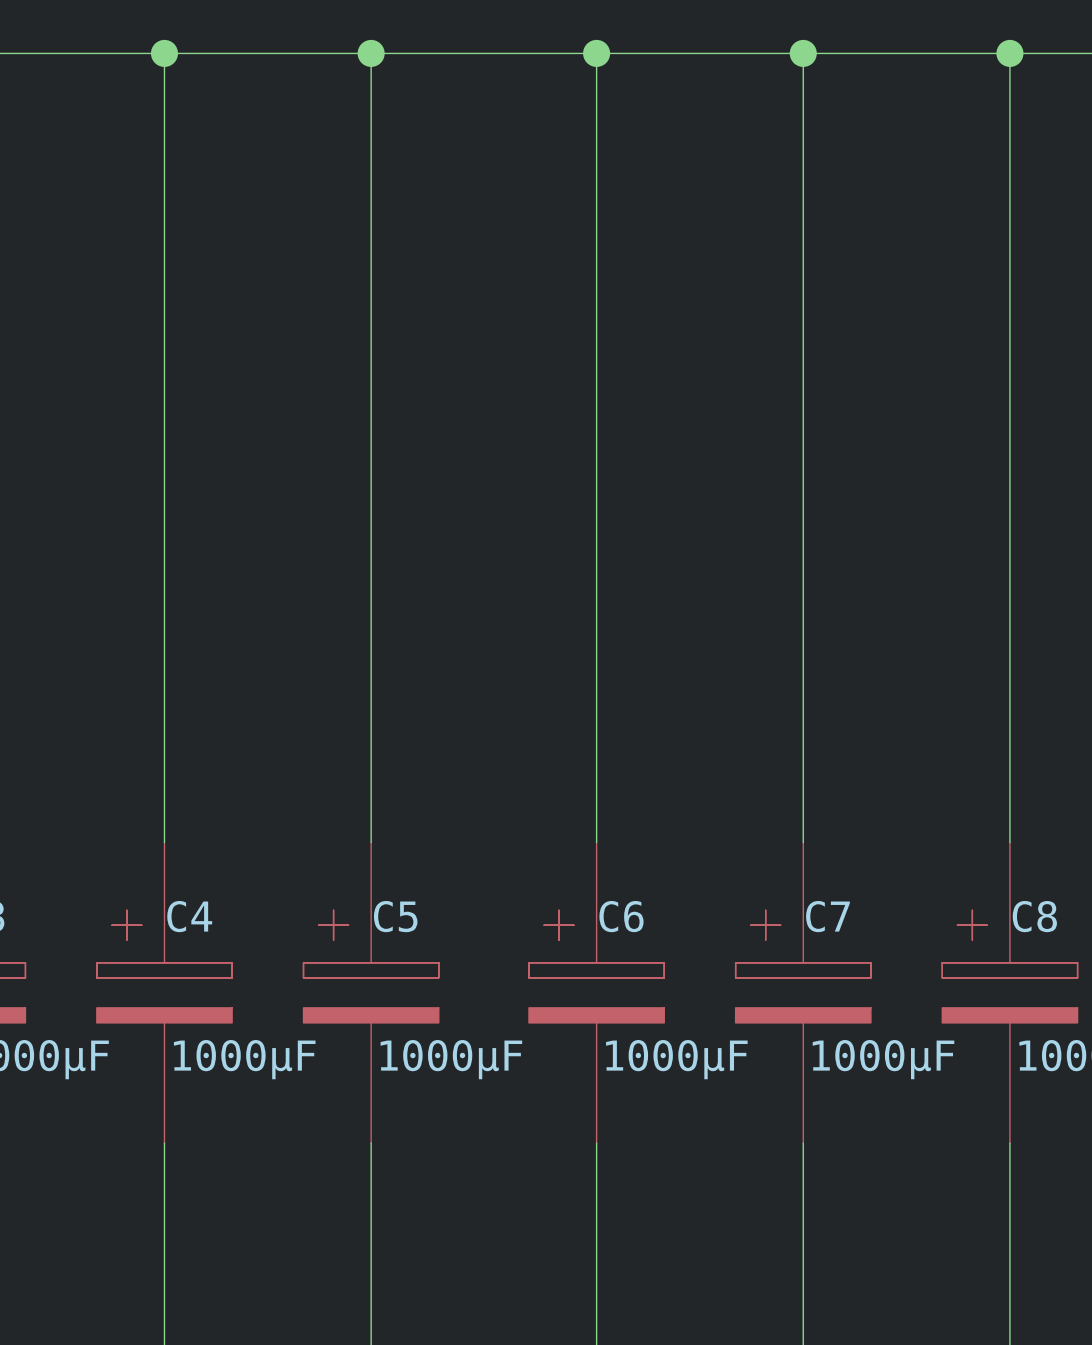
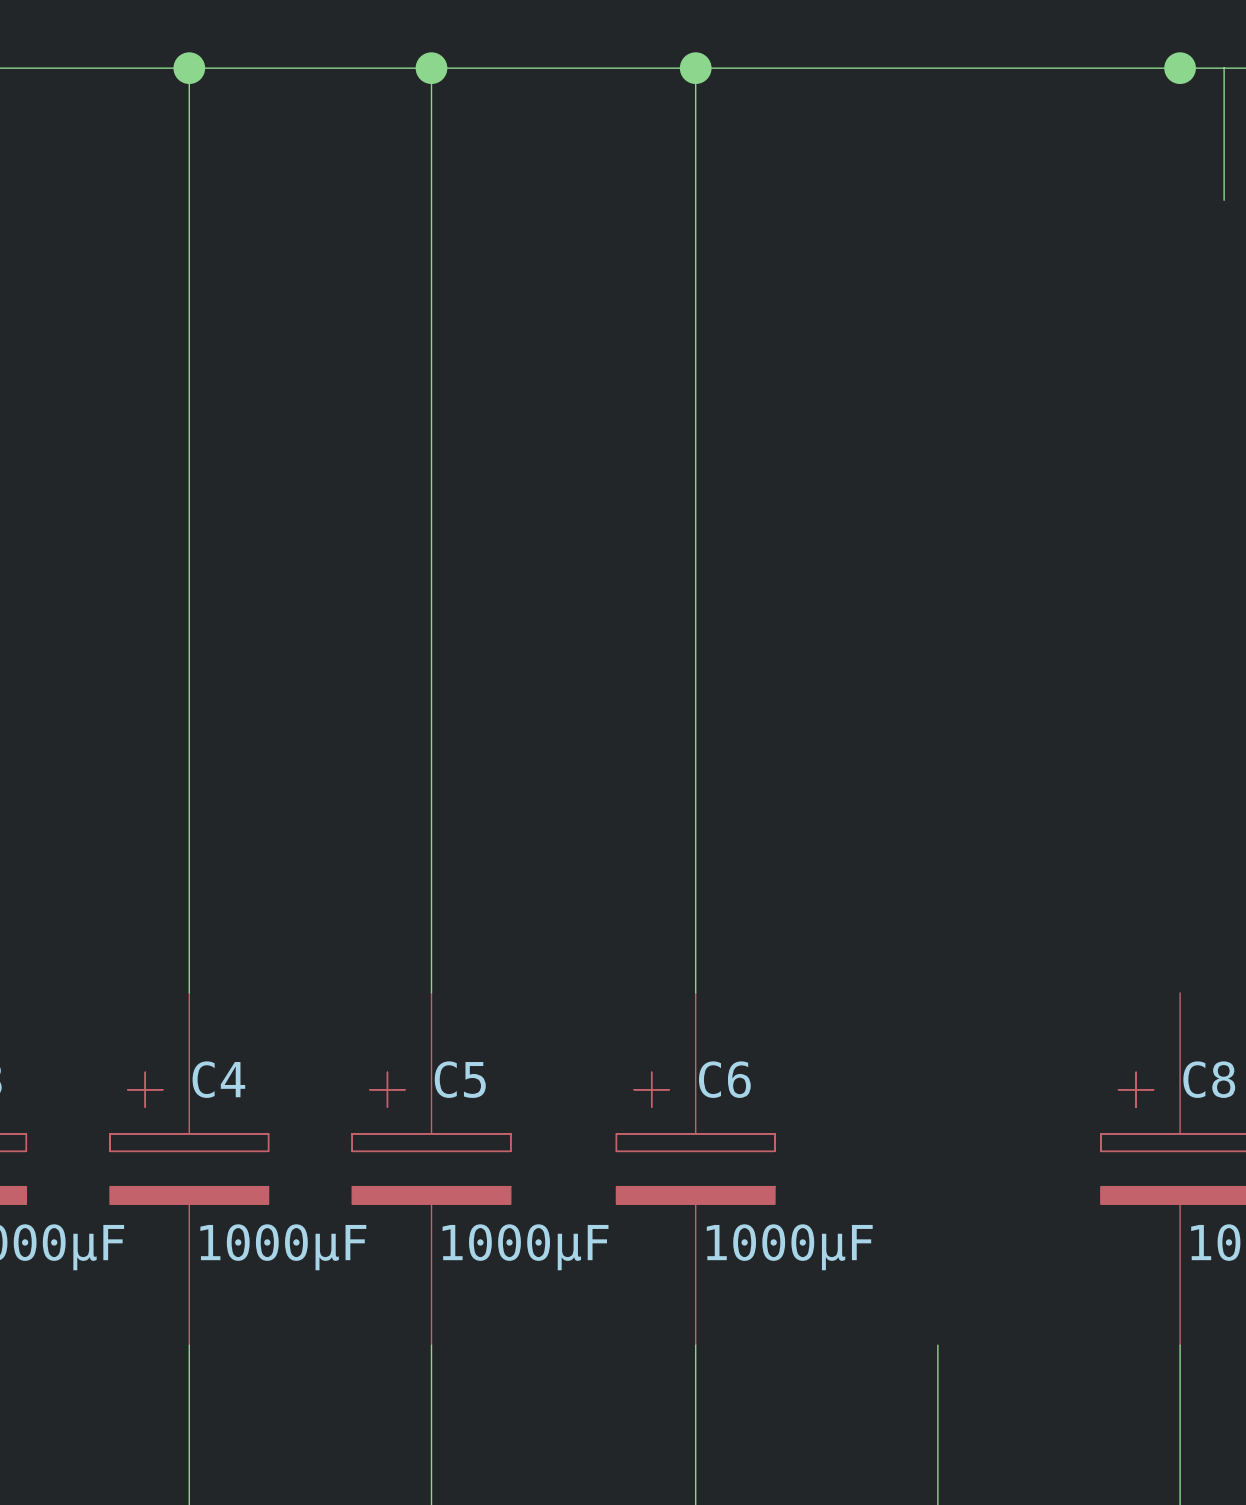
wire: (803, 53) (803, 842) -> none
junction: (803, 53) -> none
wire: (1009, 53) (1009, 842) -> none
wire: none -> (1224, 68) (1224, 200)
C7: 1000µF (803, 992) -> none

